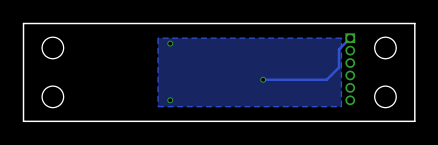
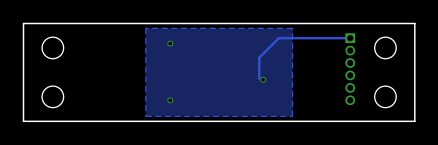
zone outline: (341, 38) (341, 106) (158, 106) (158, 38) (341, 38) -> (292, 28) (292, 116) (145, 116) (145, 28) (292, 28)
track: none -> (346, 38) (278, 38) (259, 57) (259, 78)
track: (350, 38) (339, 49) (339, 67) (326, 79) (263, 79) -> none

